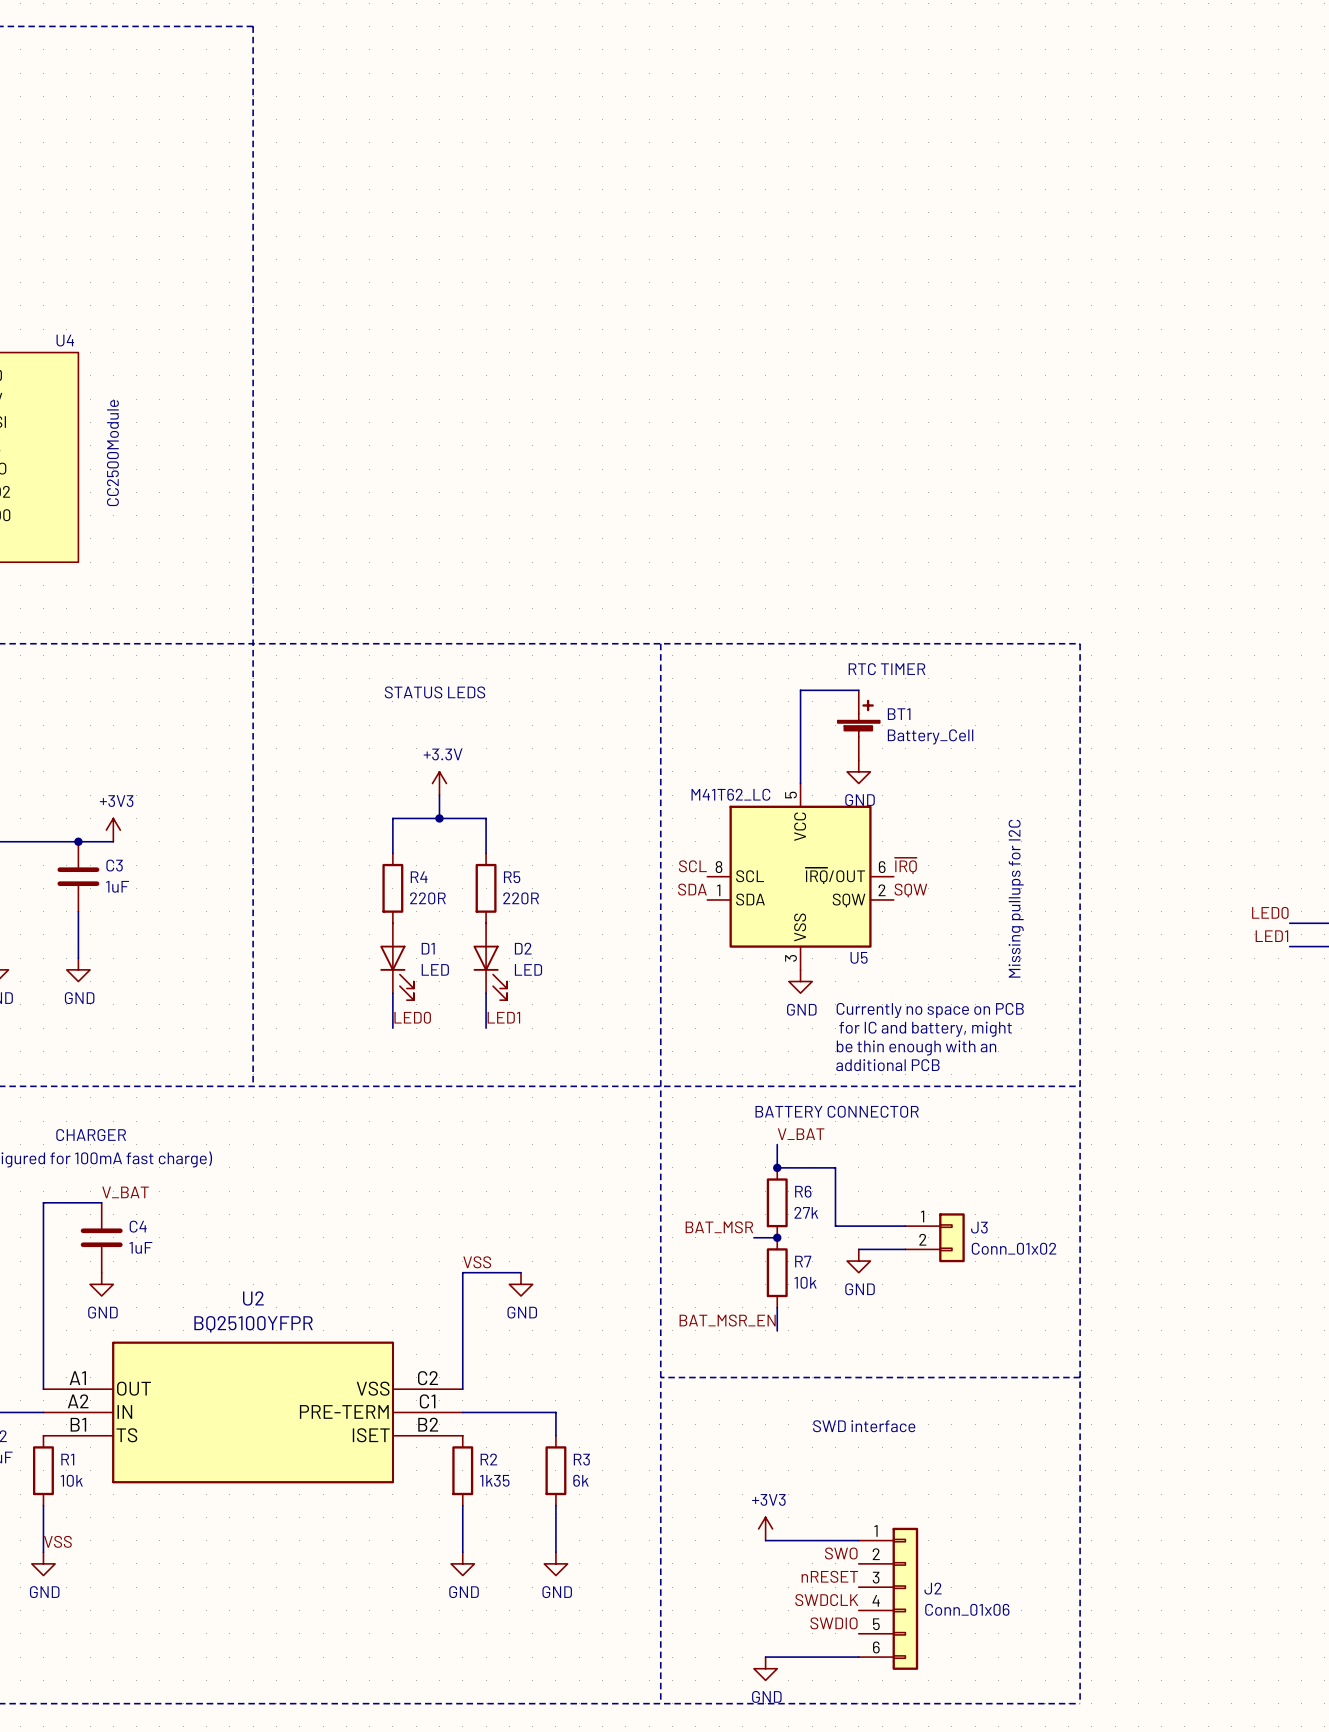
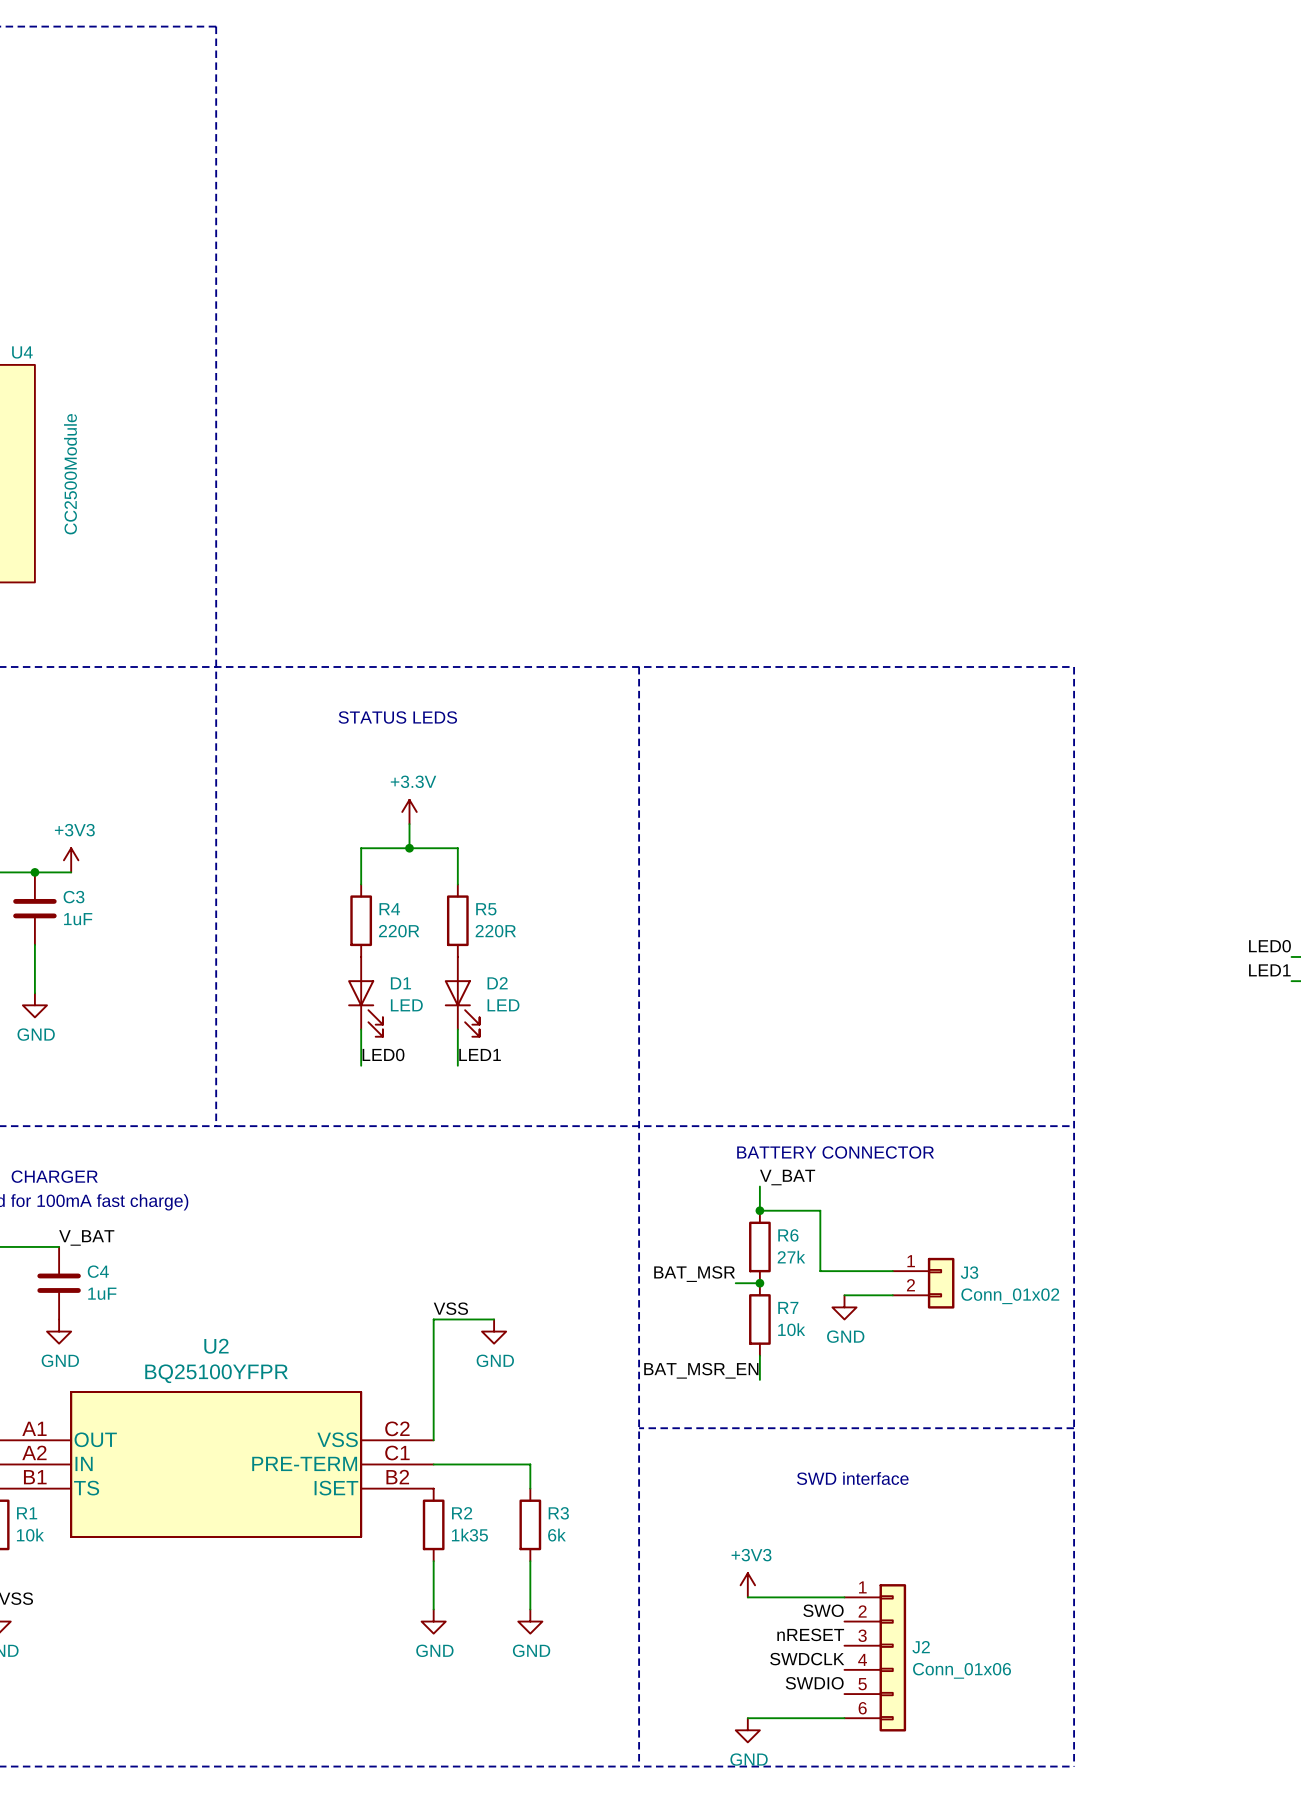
text: RTC TIMER (887, 669) -> none
wire: (858, 690) (800, 690) (800, 783) -> none
BT1: Battery_Cell (858, 725) -> none
power symbol: GND (858, 771) -> none
label: ~{IRQ} (905, 865) -> none
label: SCL (692, 866) -> none
U5: M41T62_LC (800, 876) -> none
label: SDA (692, 889) -> none
label: SQW (910, 890) -> none
text: Missing pullups for I2C (1016, 898) -> none
power symbol: GND (800, 981) -> none
text: Currently no space on PCB (930, 1010) -> none
text: for IC and battery, might (925, 1029) -> none
text: be thin enough with an (916, 1047) -> none
text: additional PCB (887, 1065) -> none

